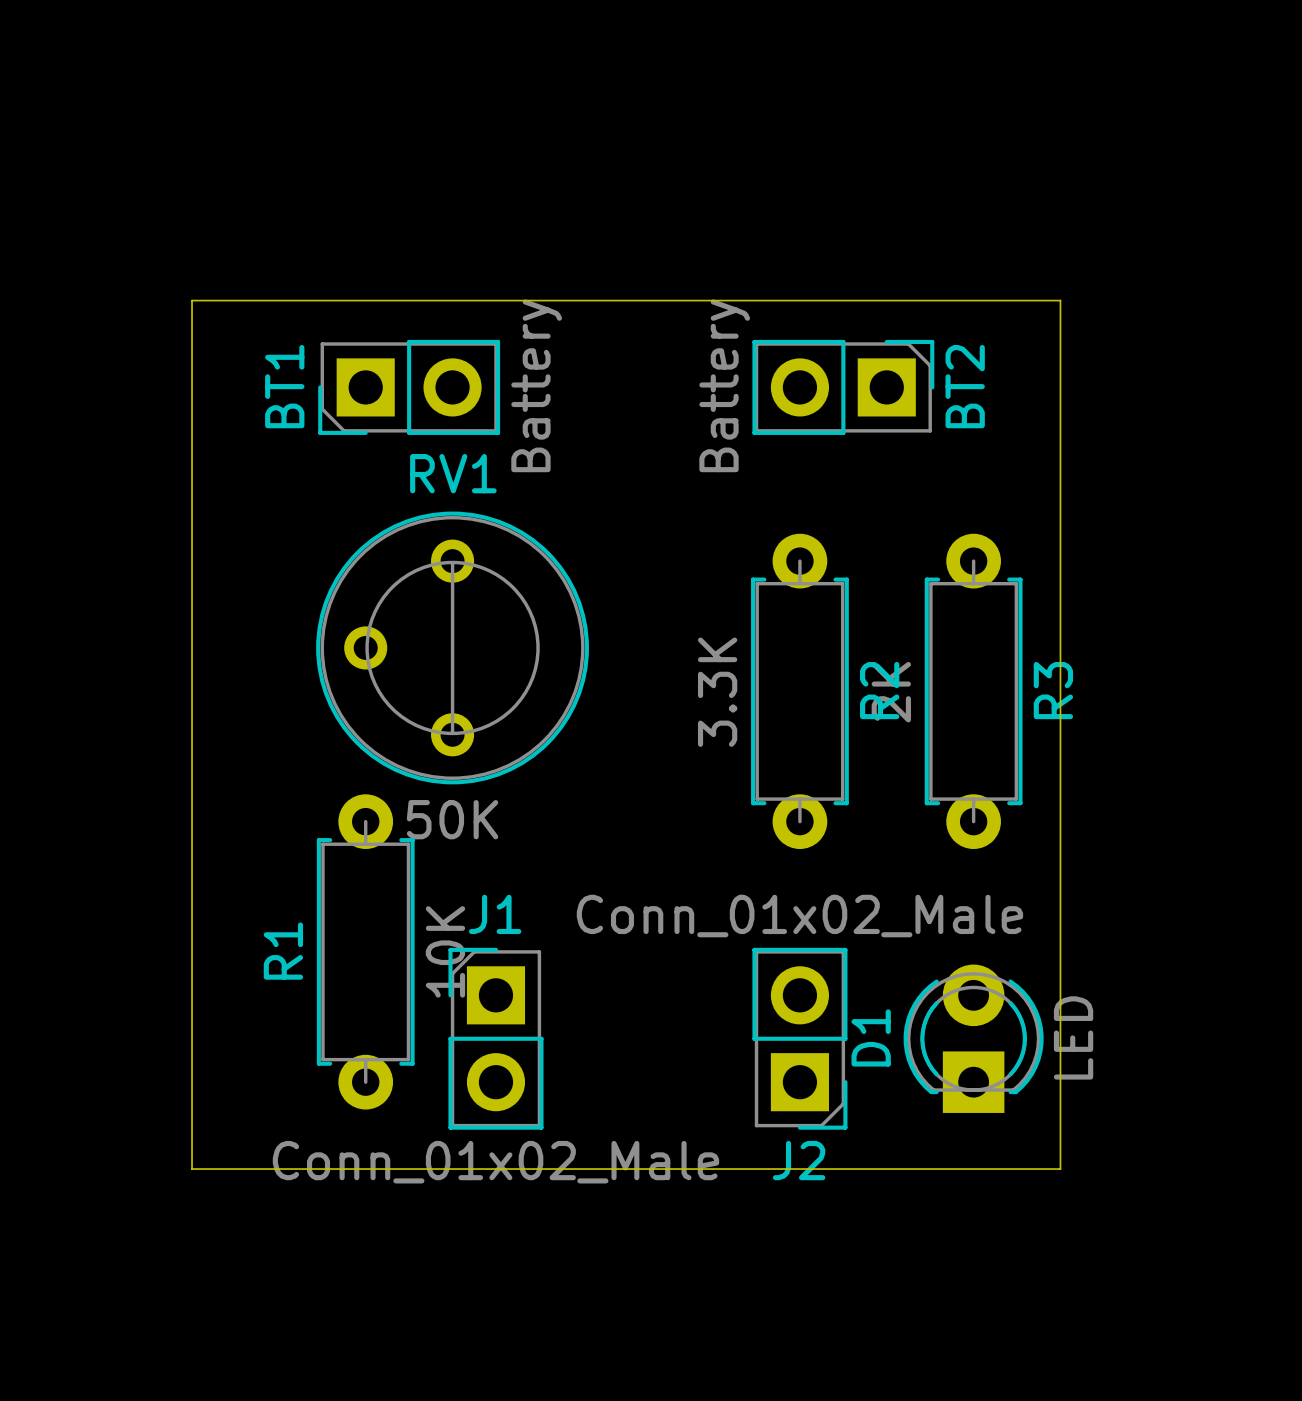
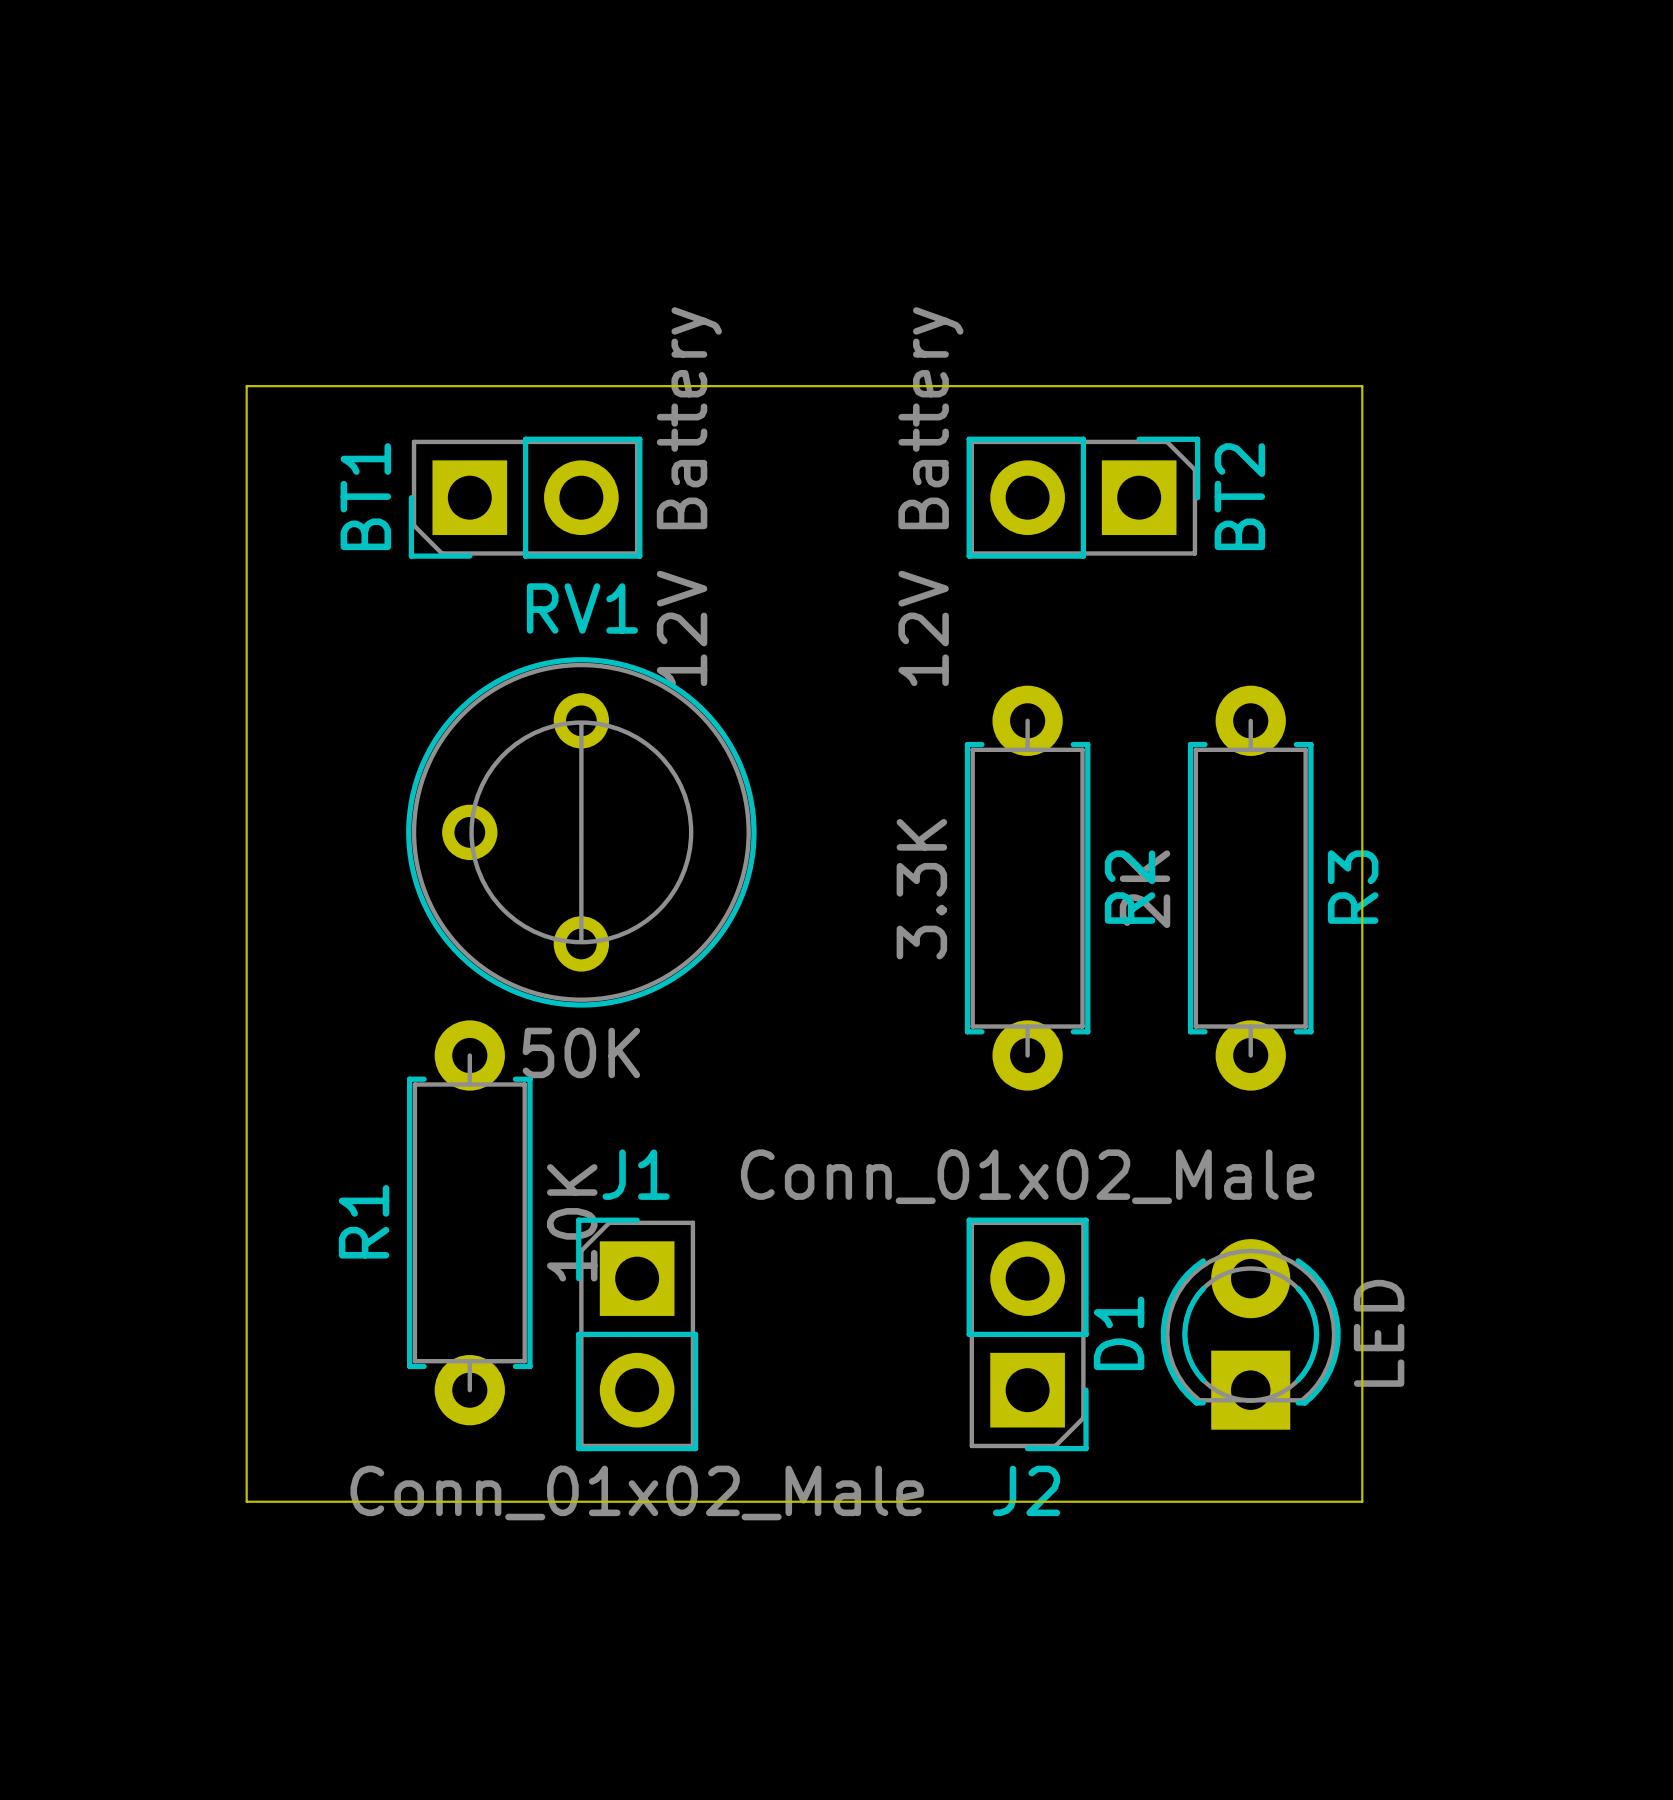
BT1 value: Battery (536, 385) -> 12V Battery (689, 496)
BT2 value: Battery (724, 385) -> 12V Battery (930, 496)

